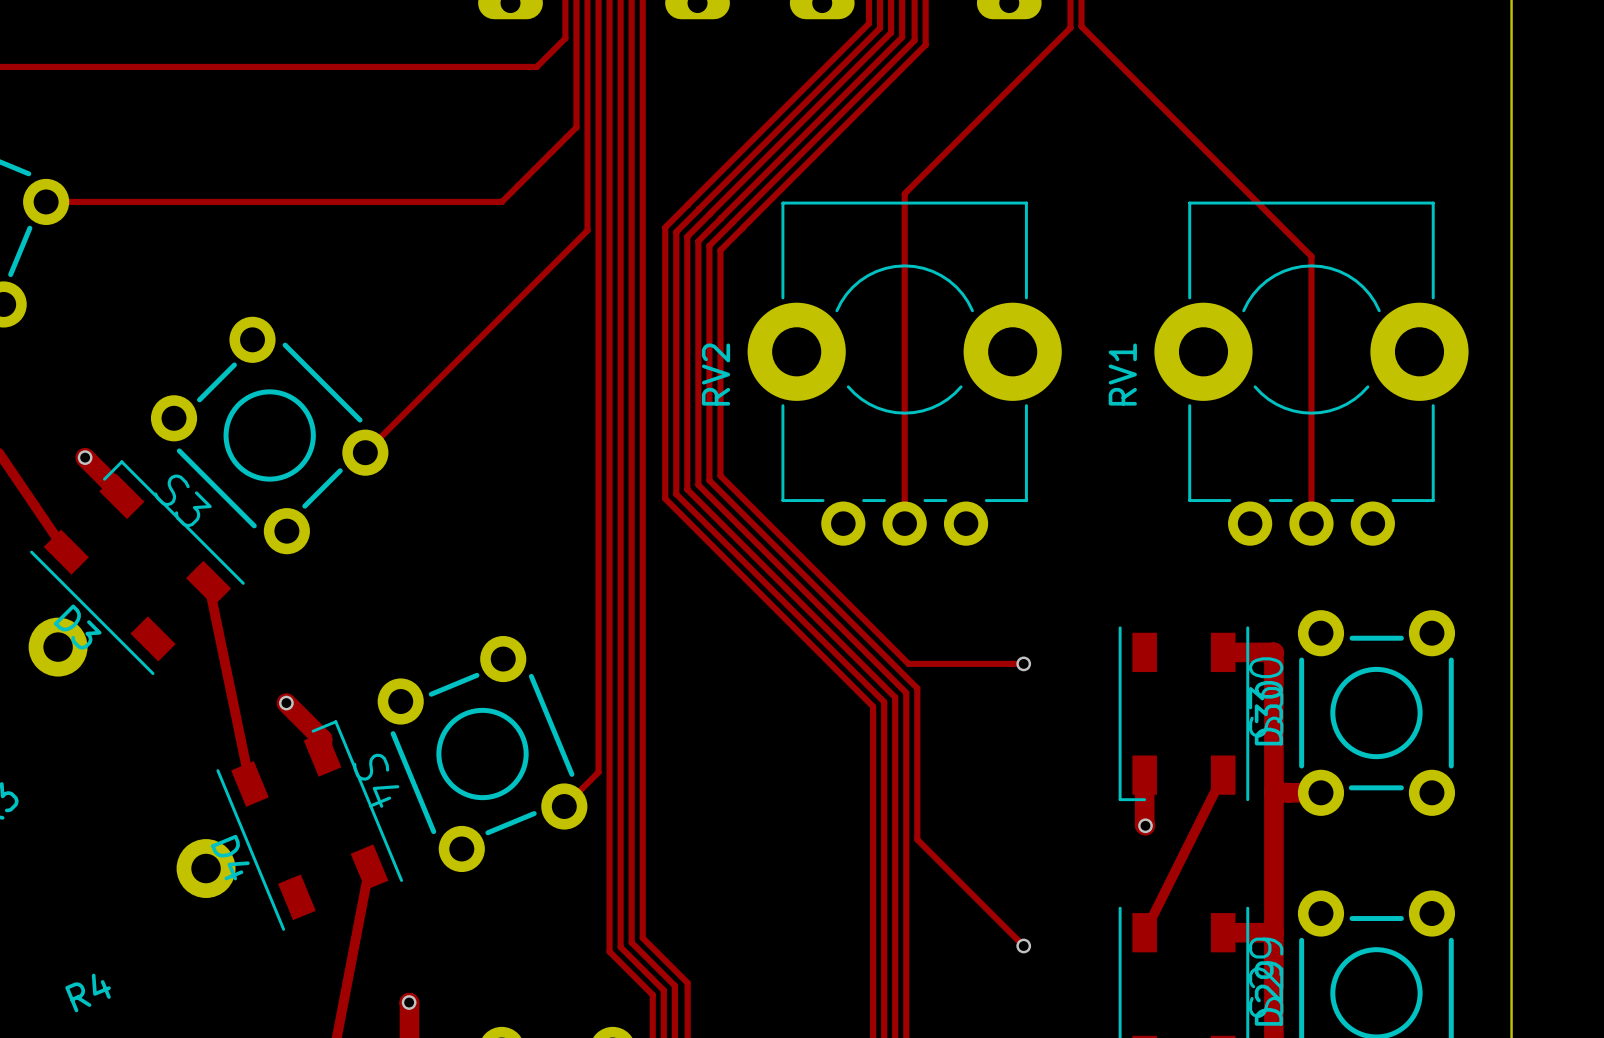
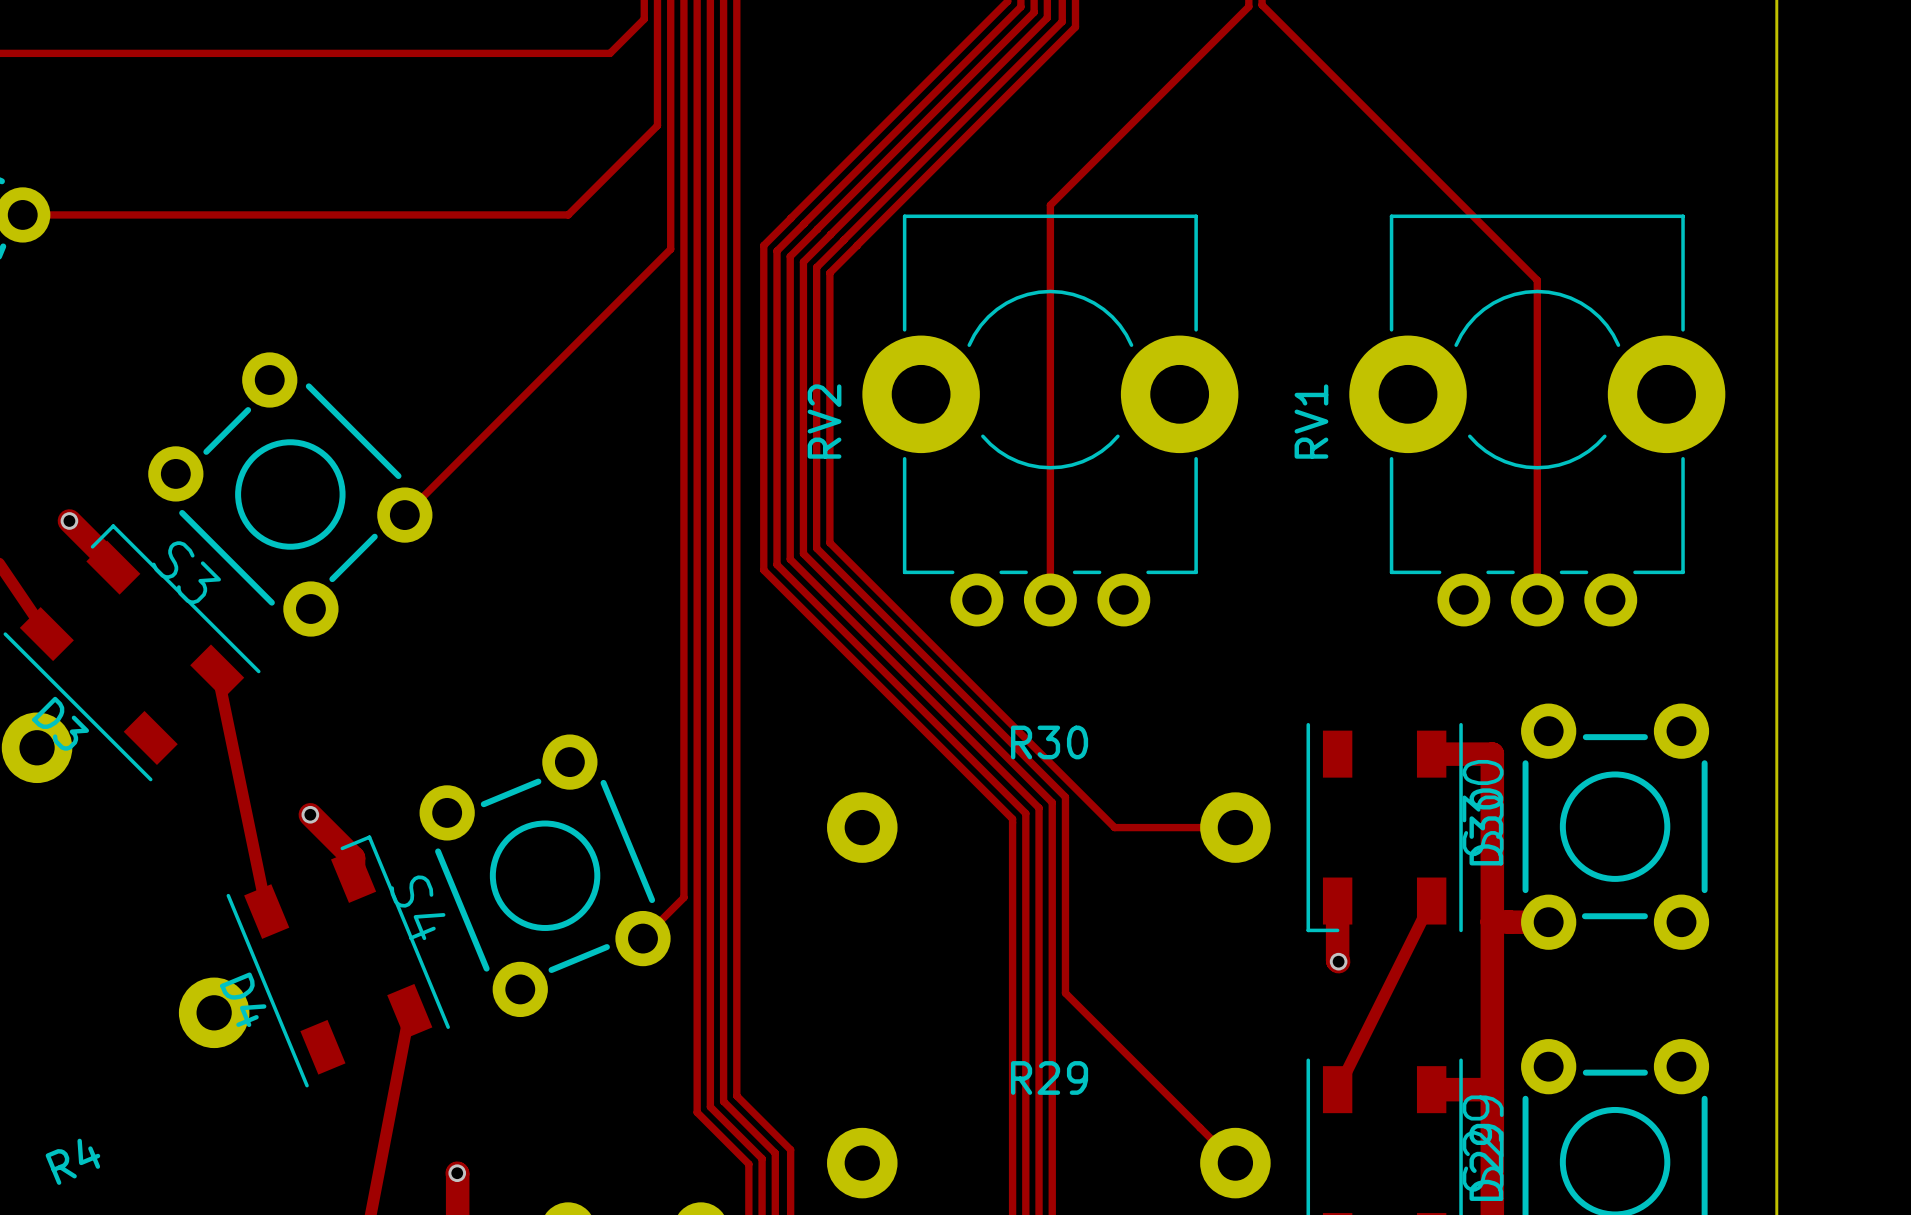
track: (908, 663) (1023, 663) -> (1054, 767) (1114, 827) (1235, 827)
via: (1023, 663) -> none
R30: none -> (1048, 827)
track: (917, 839) (1023, 946) -> (1065, 978) (1065, 993) (1235, 1163)
via: (1023, 946) -> none
R29: none -> (1048, 1163)

